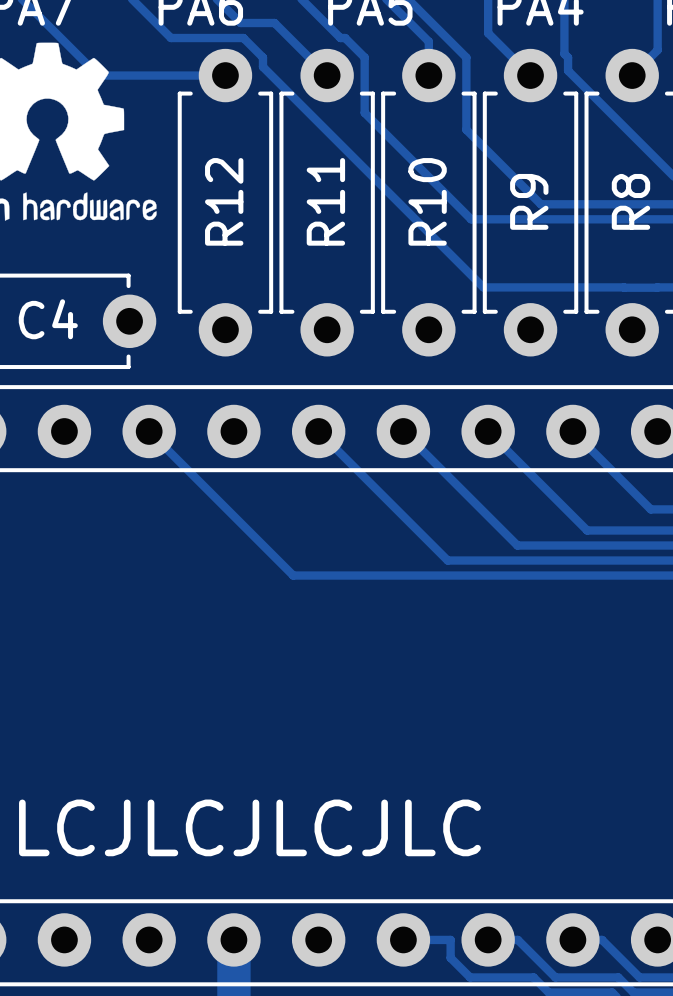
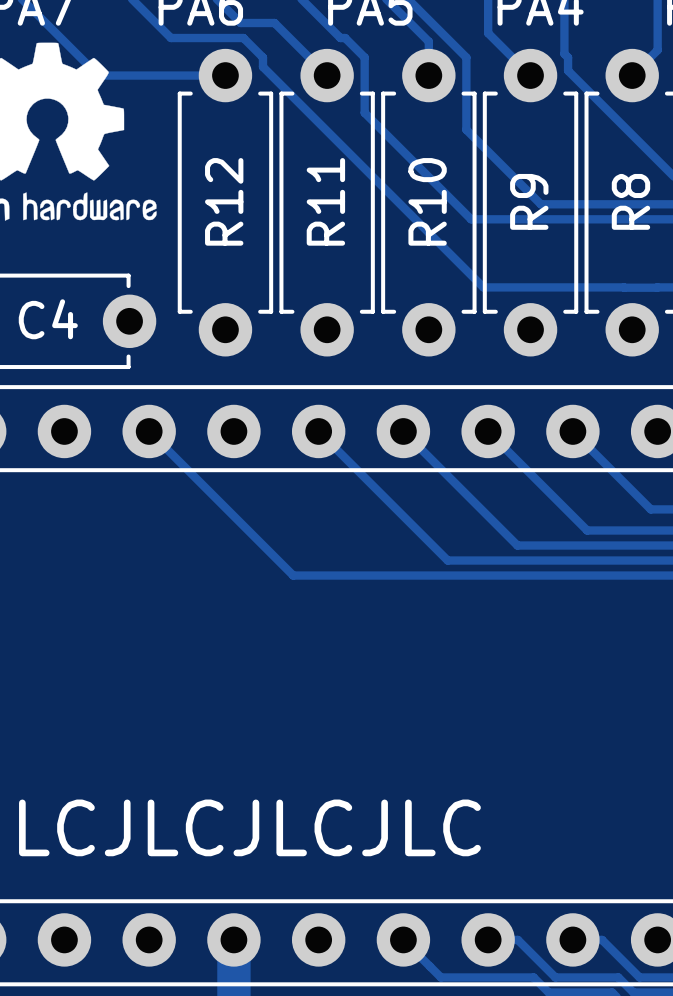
track: (403, 939) (450, 939) (450, 957) (470, 977) -> (403, 939) (440, 977) (470, 977)

